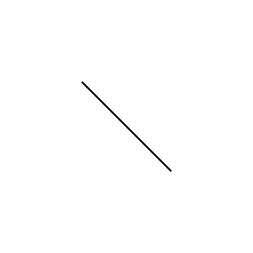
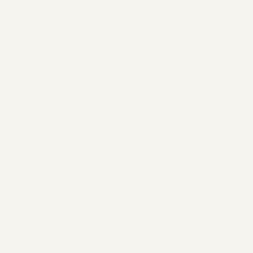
wire: (82, 82) (170, 170) -> none

